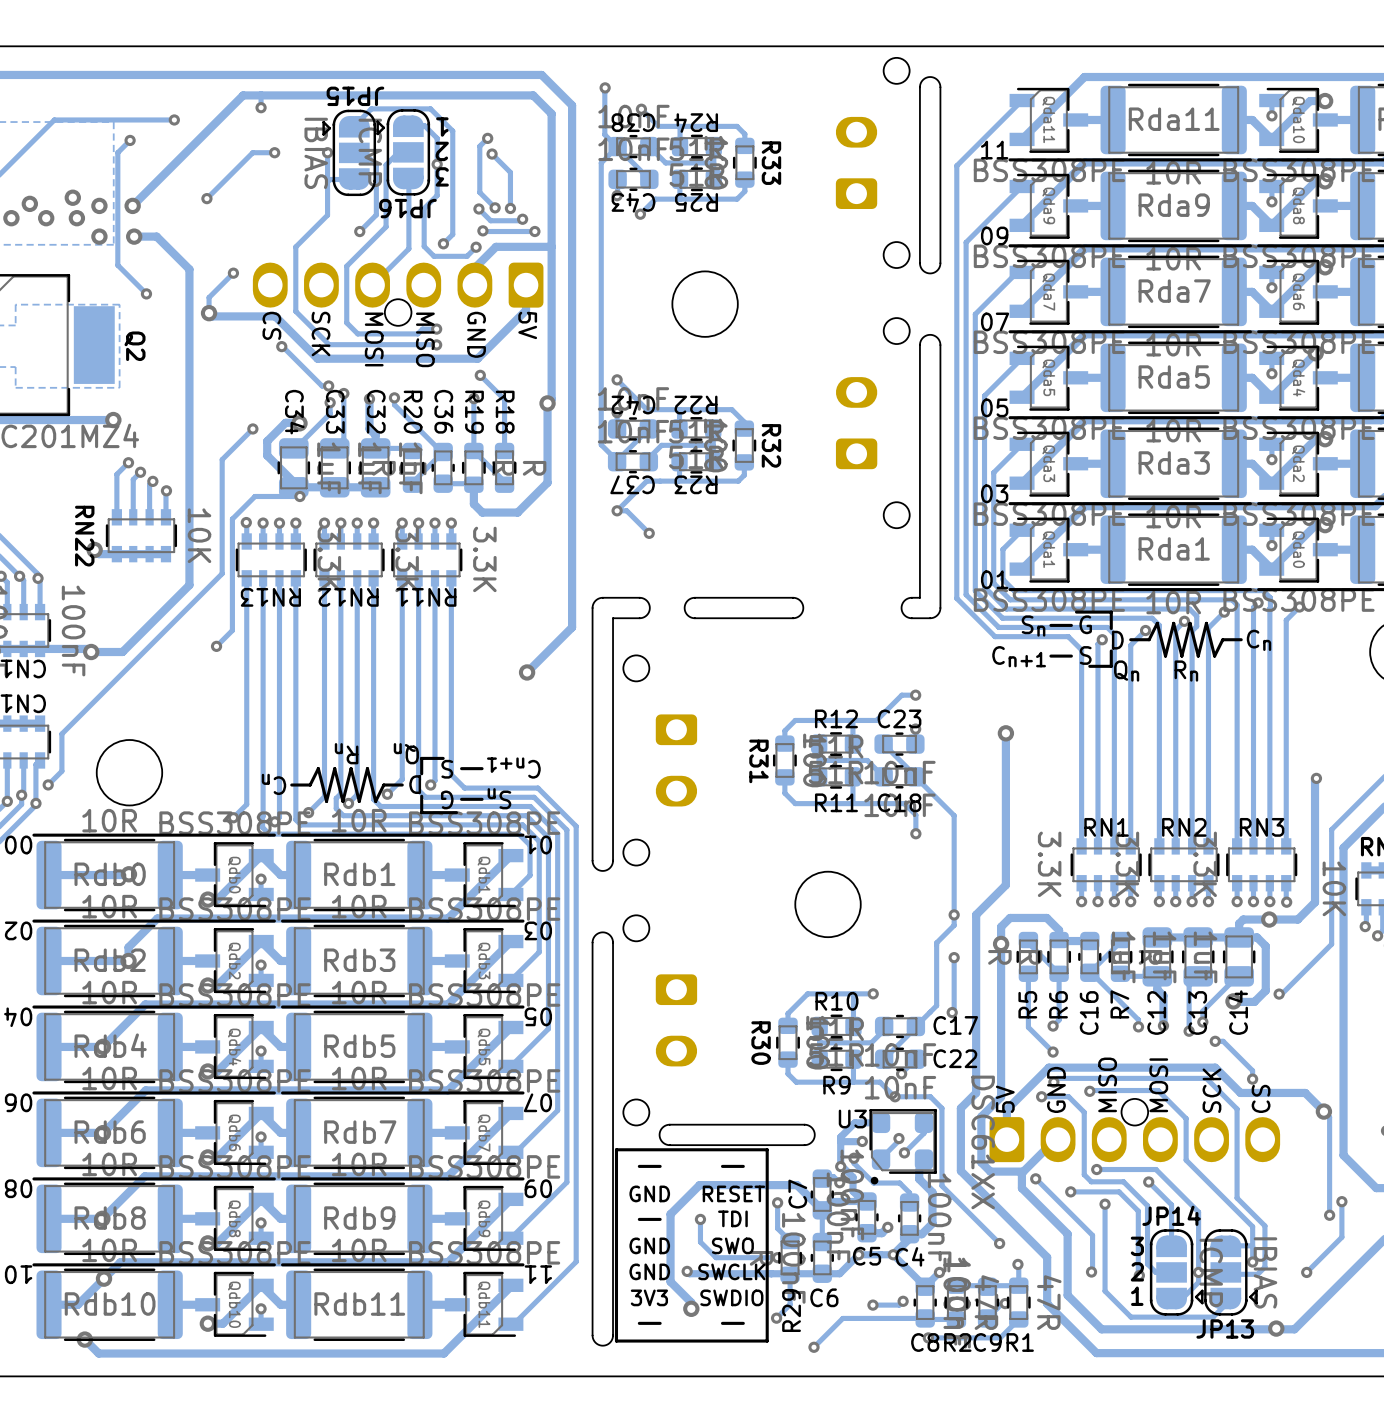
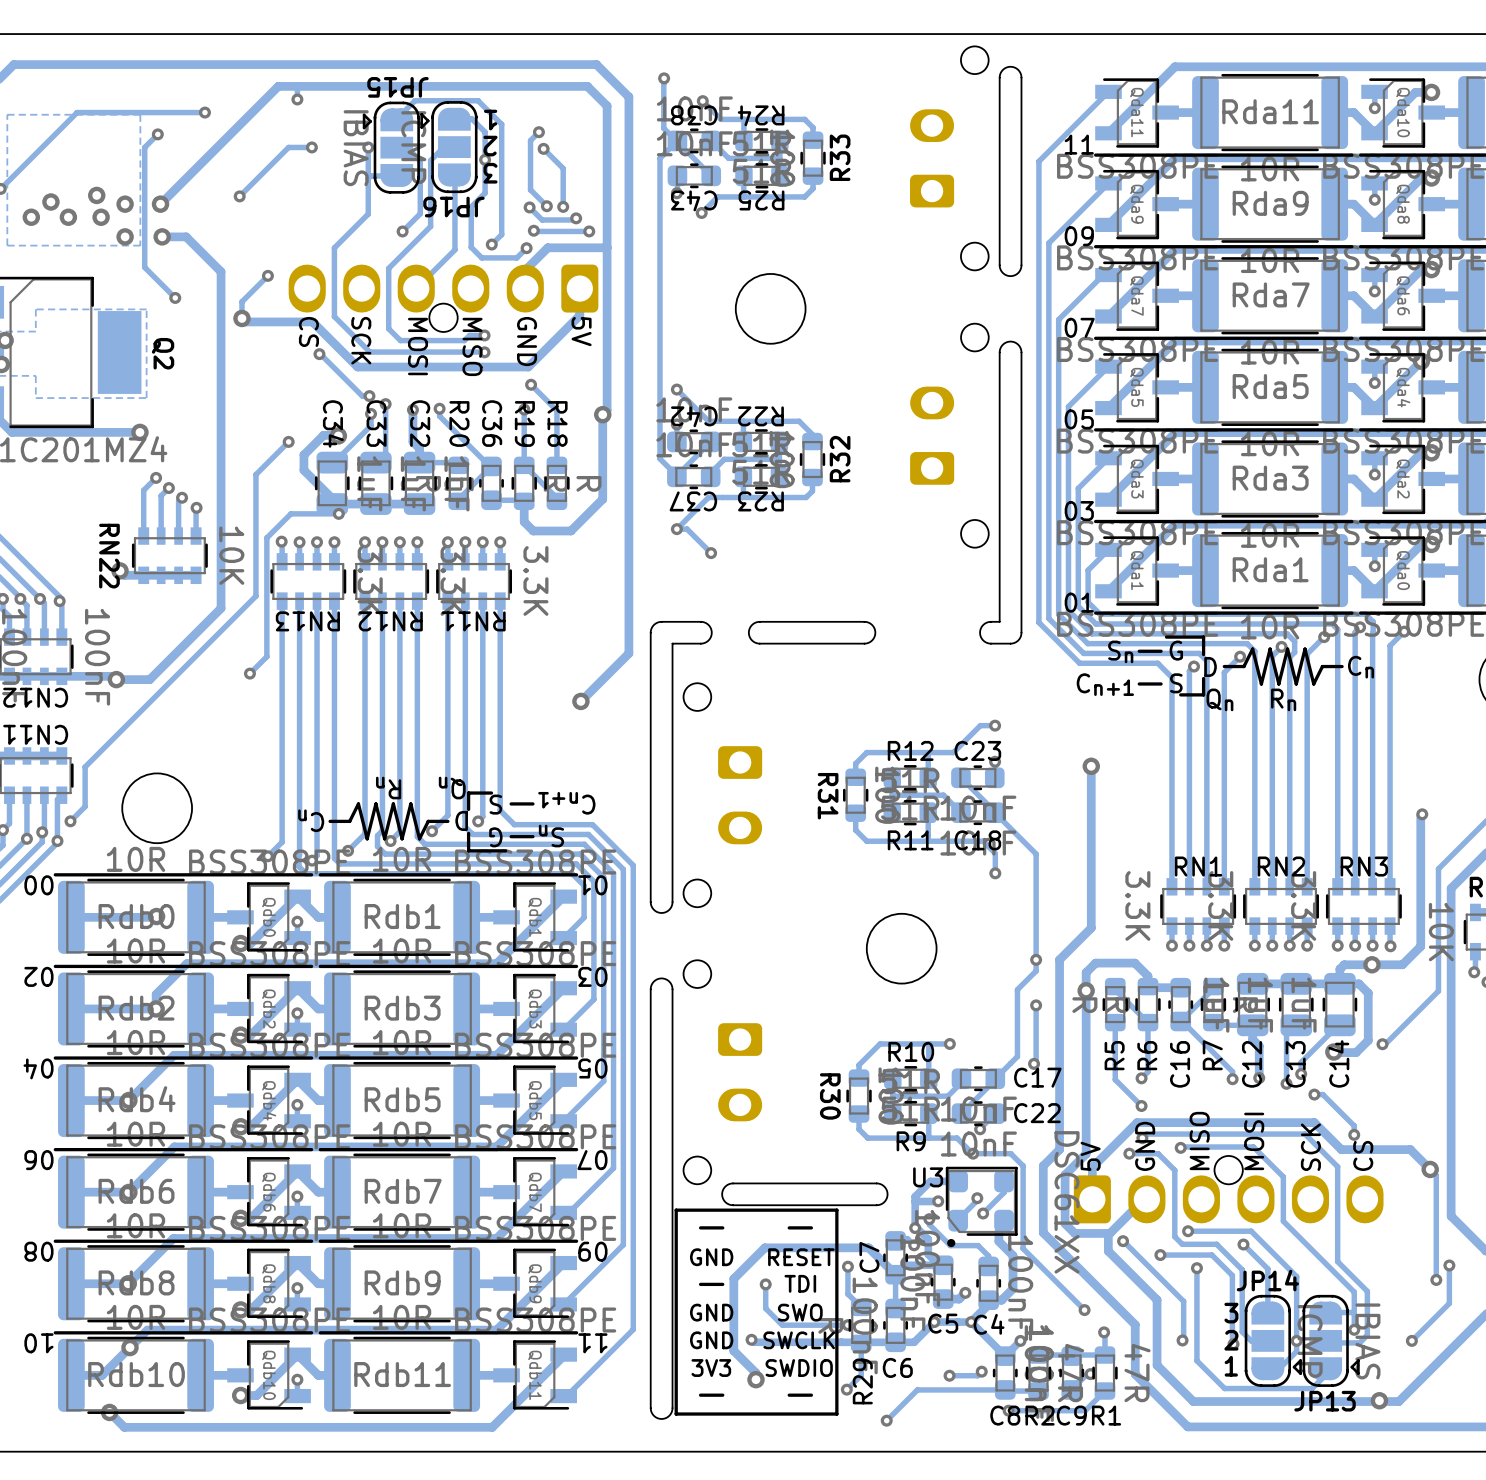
R33 name rotation: 0° (771, 163) -> 180° (840, 157)
R32 name rotation: 0° (771, 445) -> 180° (840, 459)

